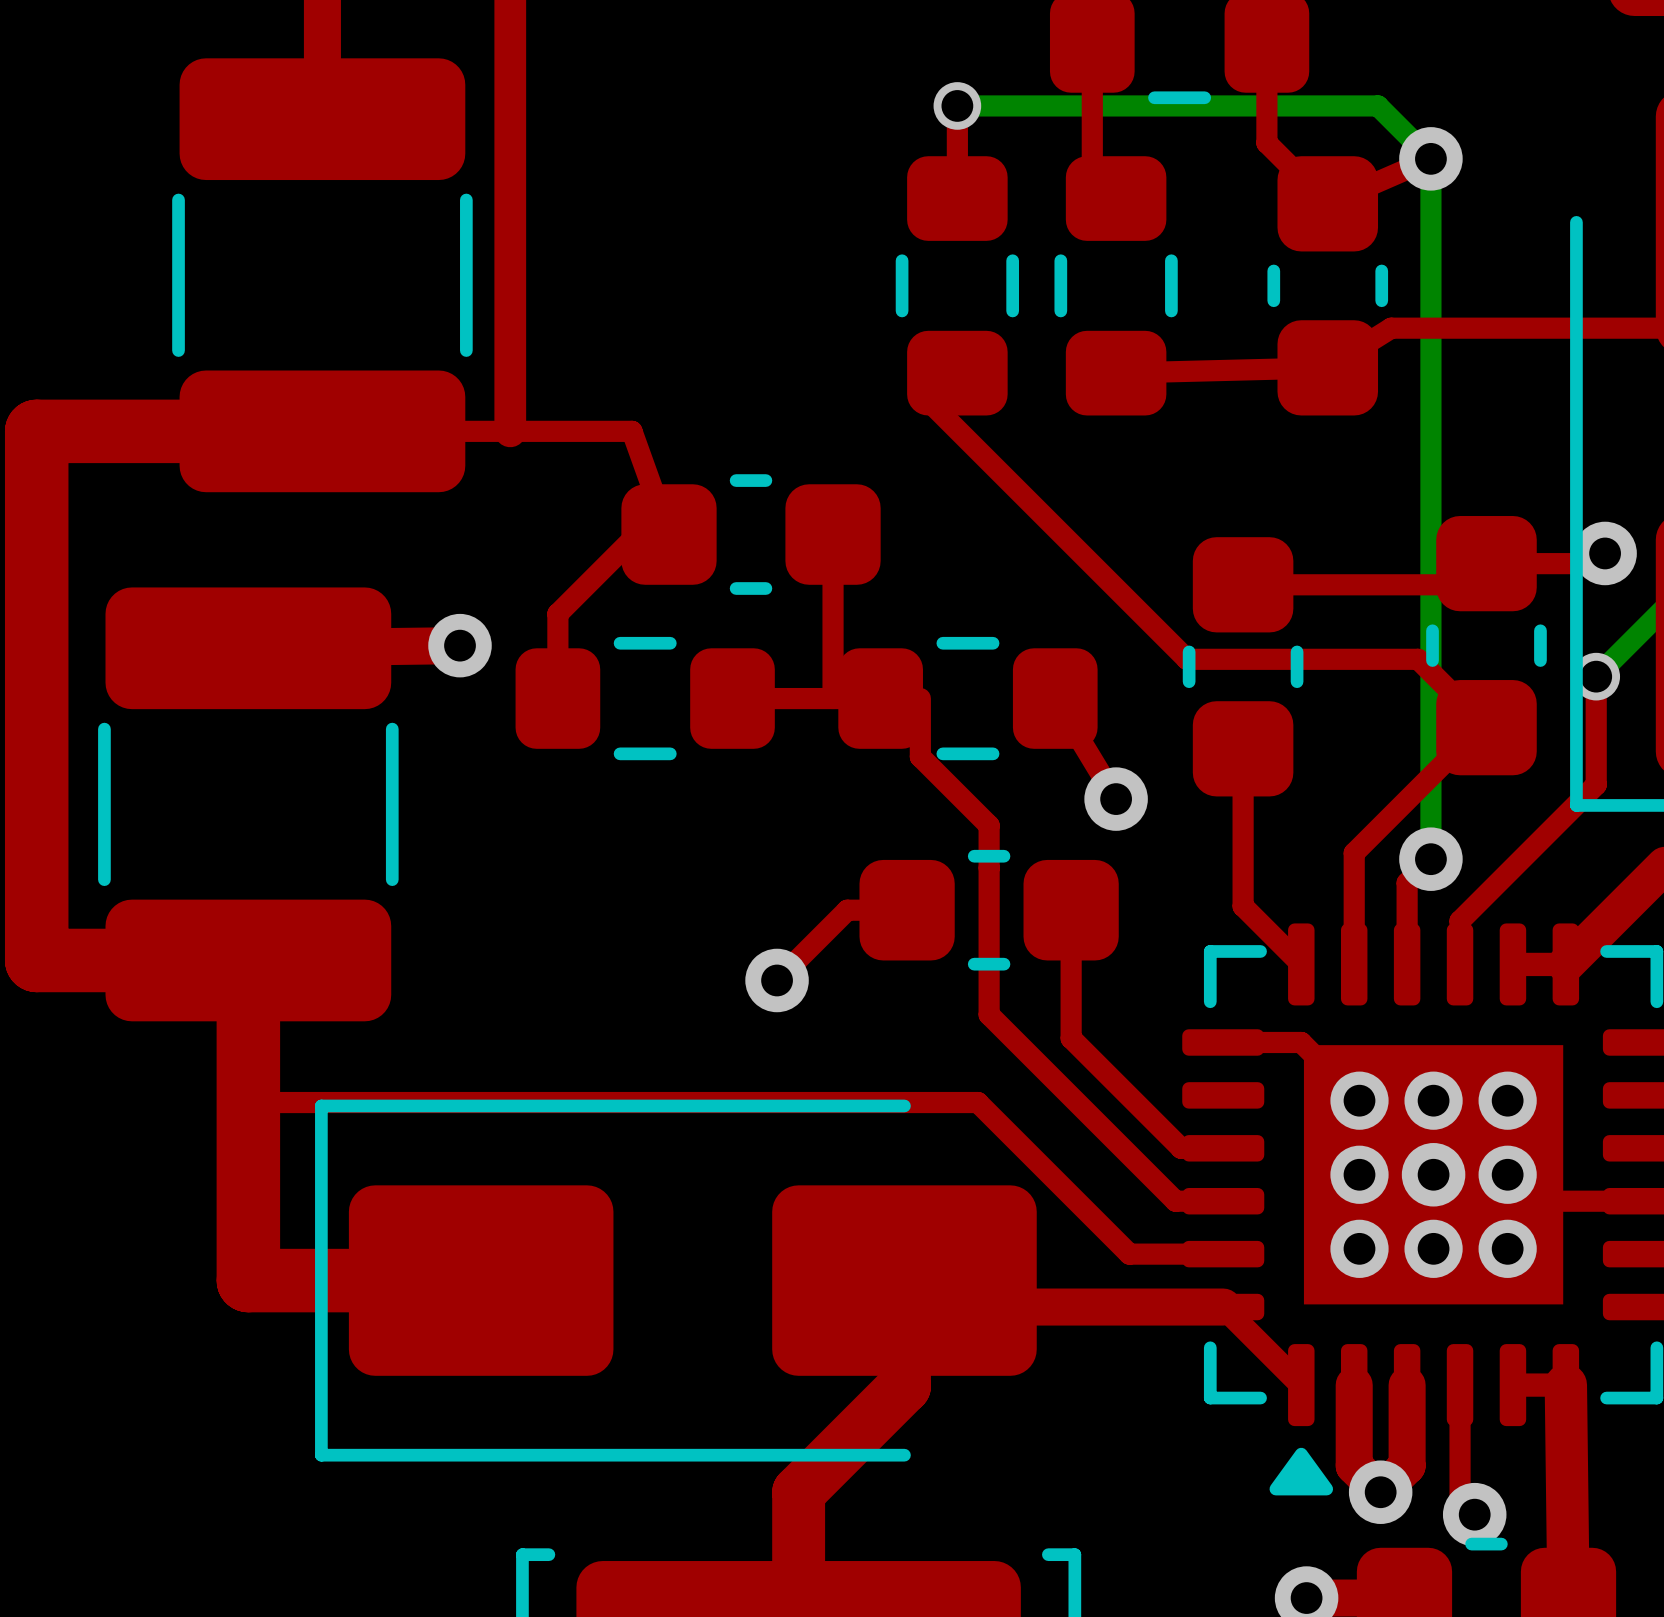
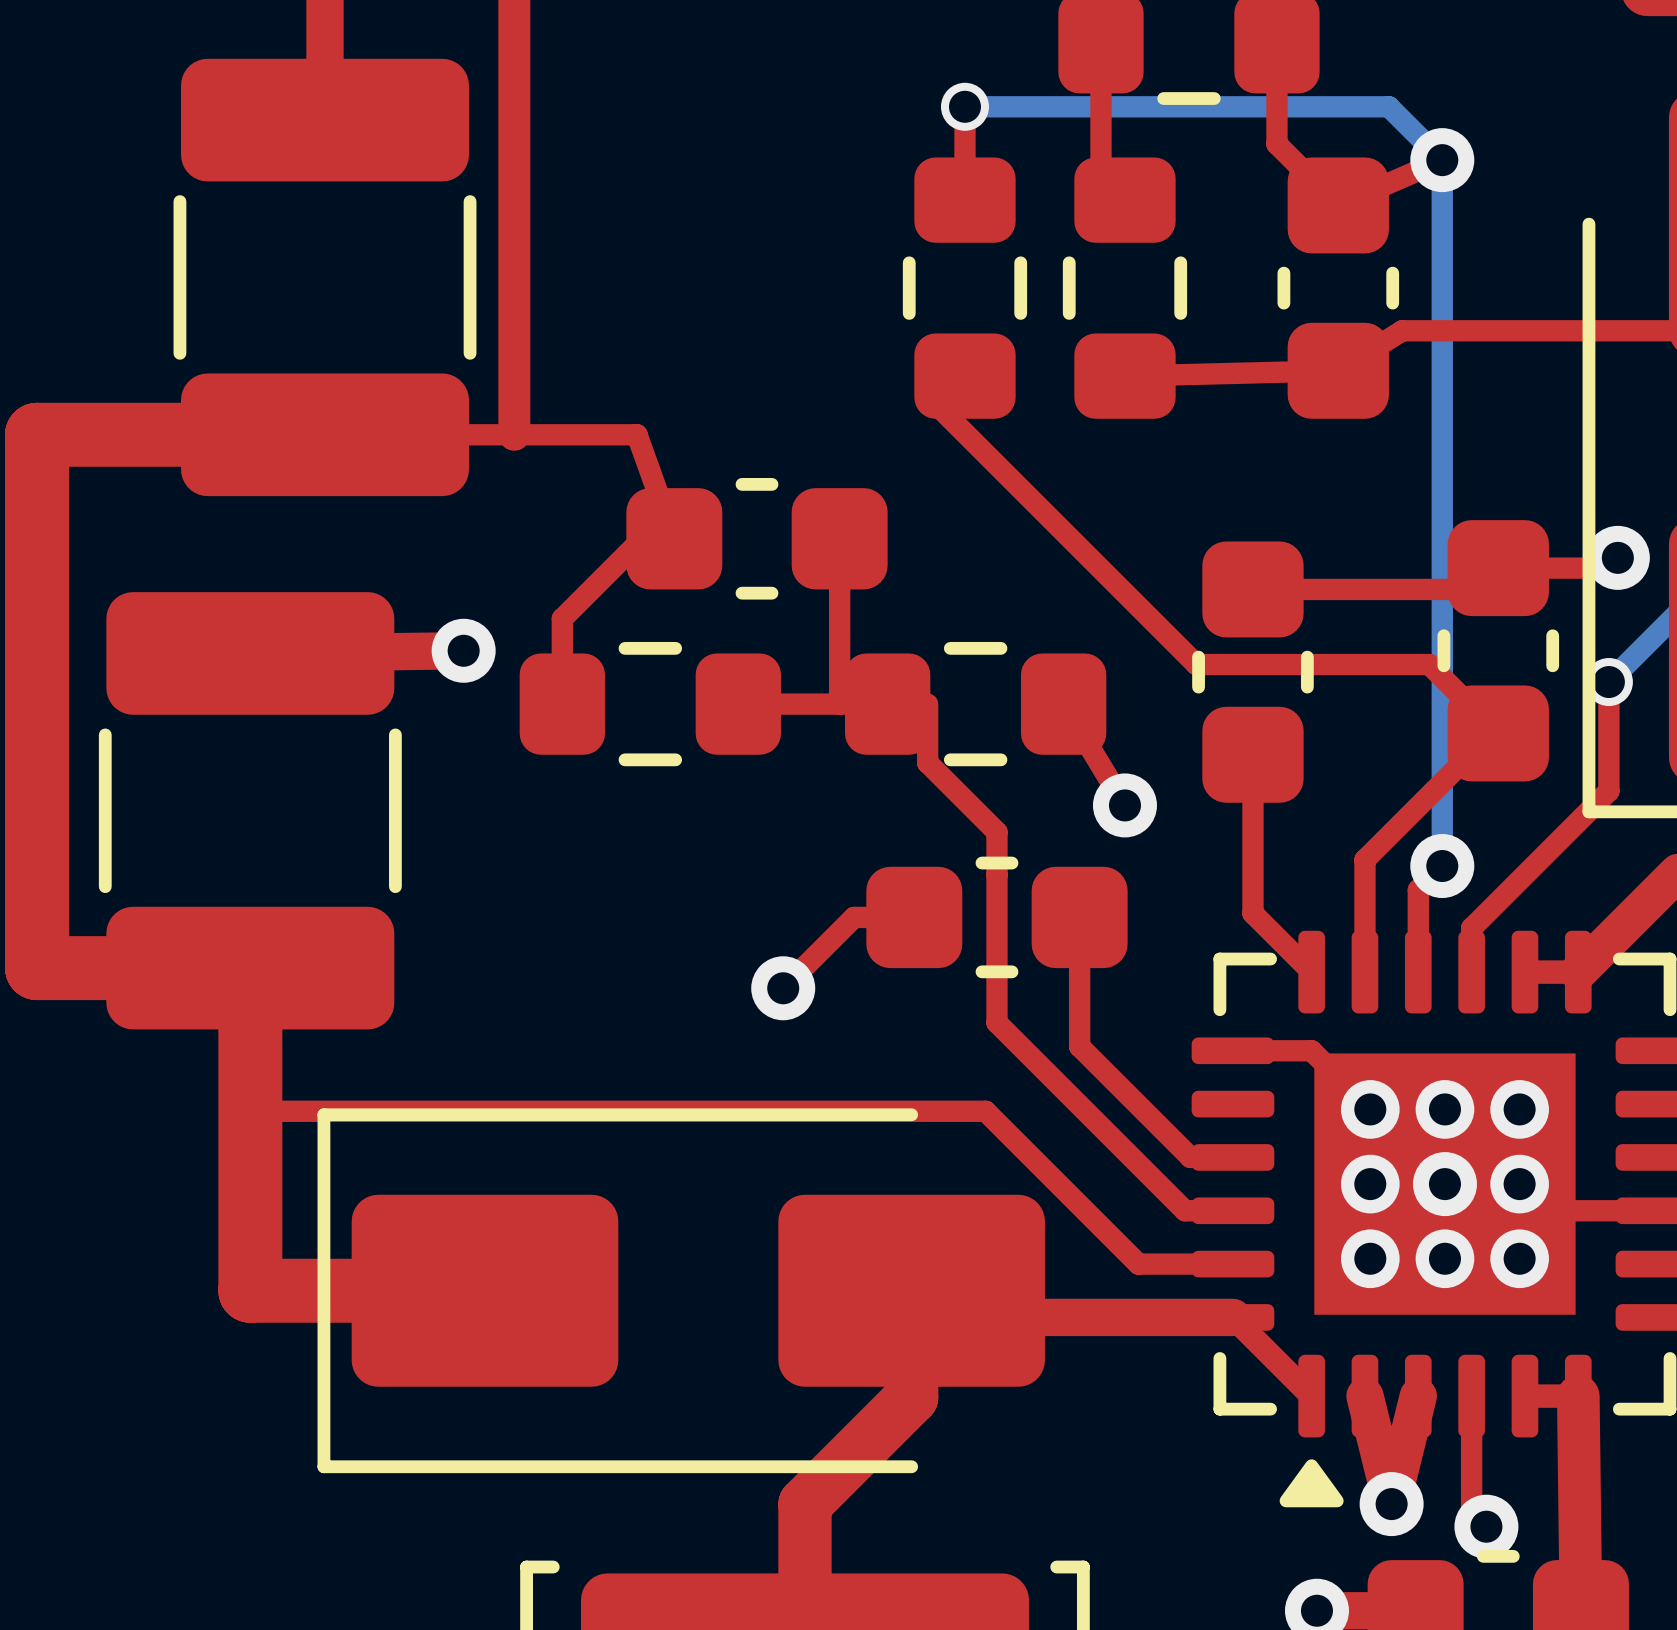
top track: (1354, 1385) (1354, 1465) (1380, 1492) (1407, 1465) (1407, 1385) -> (1364, 1396) (1391, 1504) (1418, 1396)

